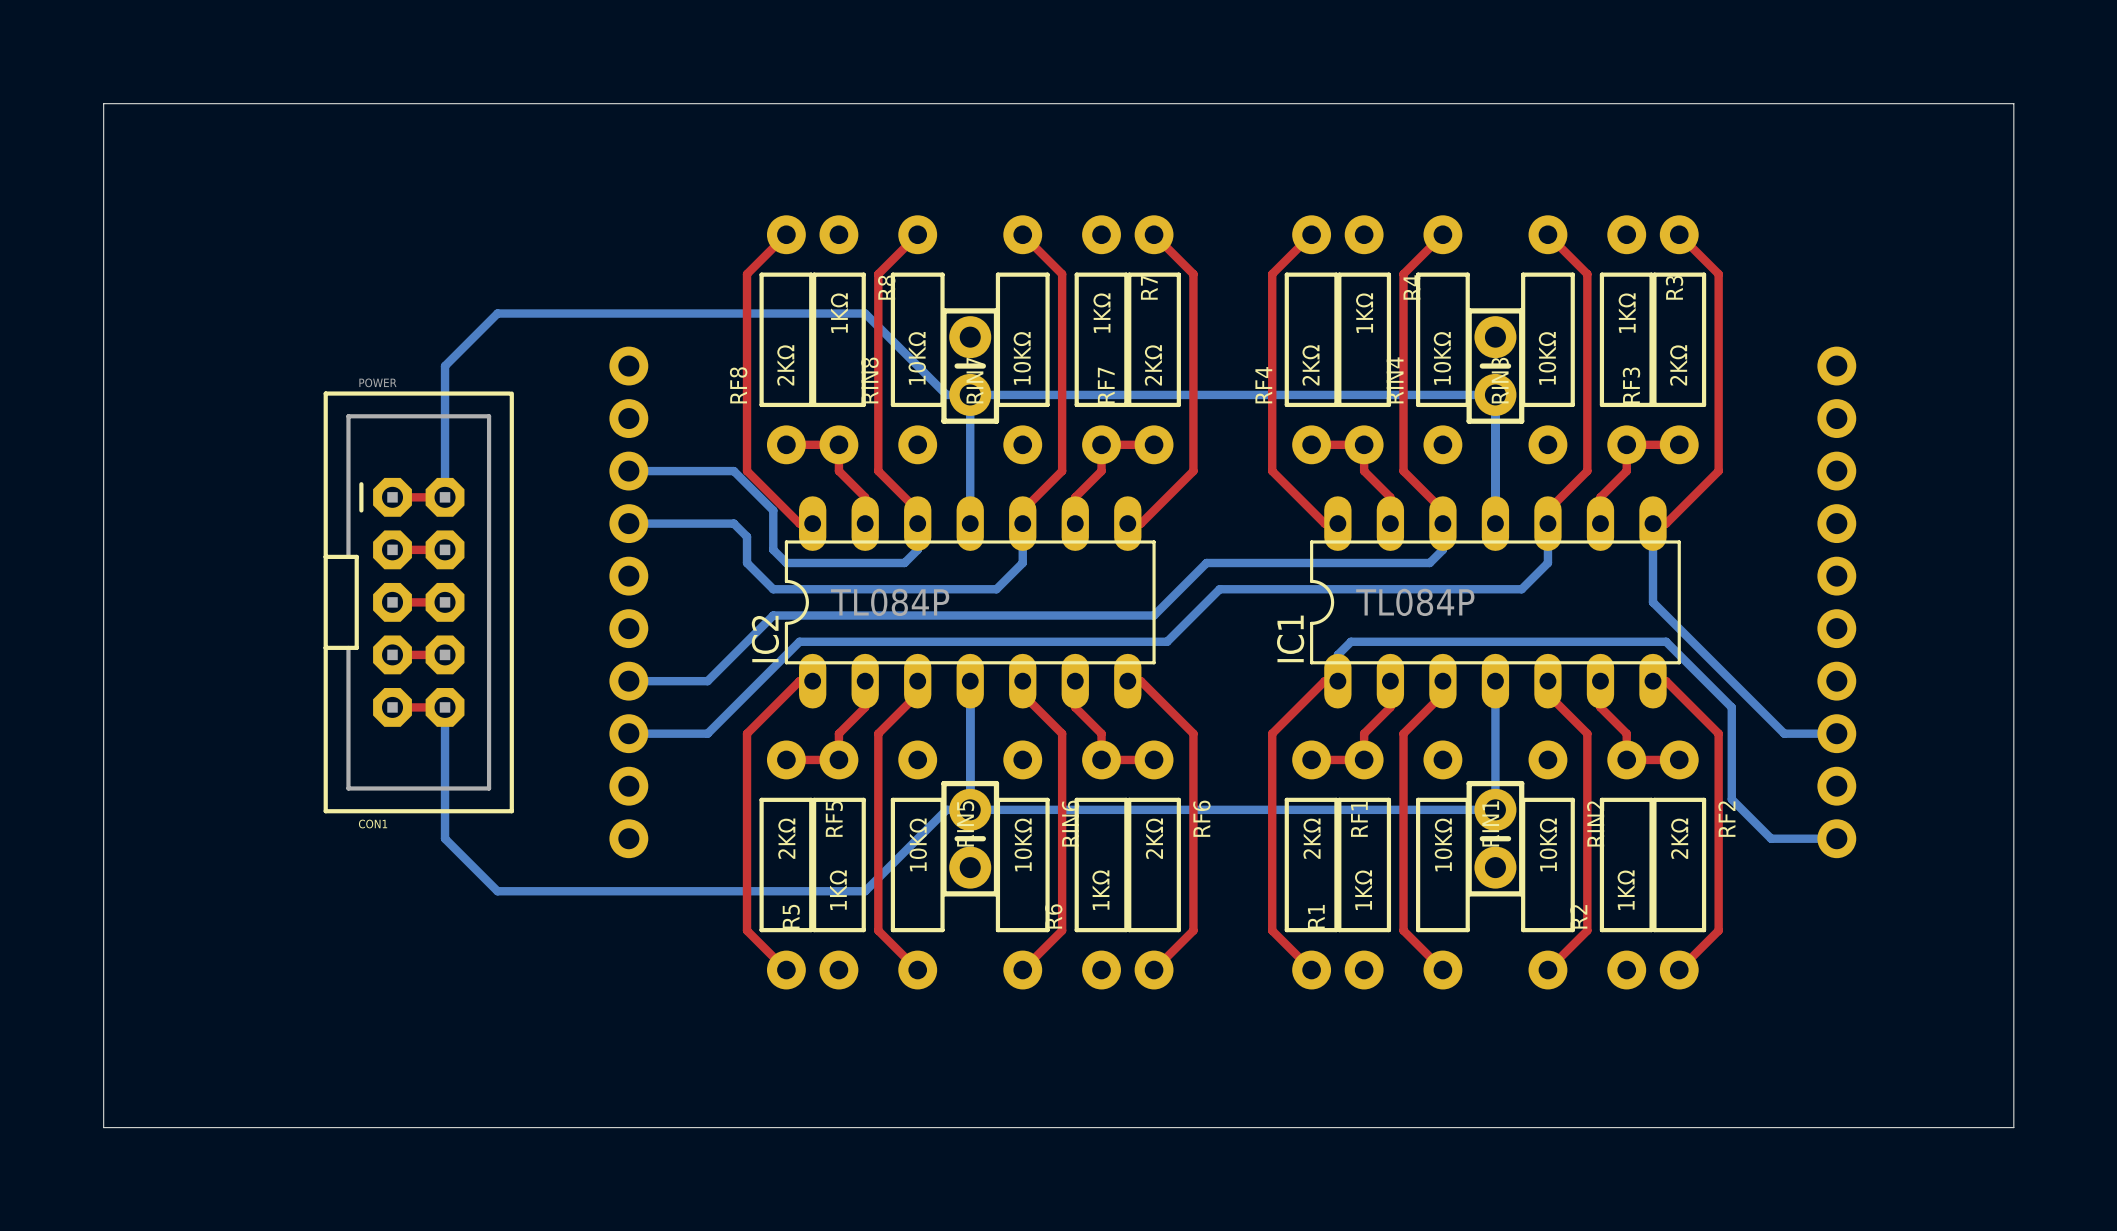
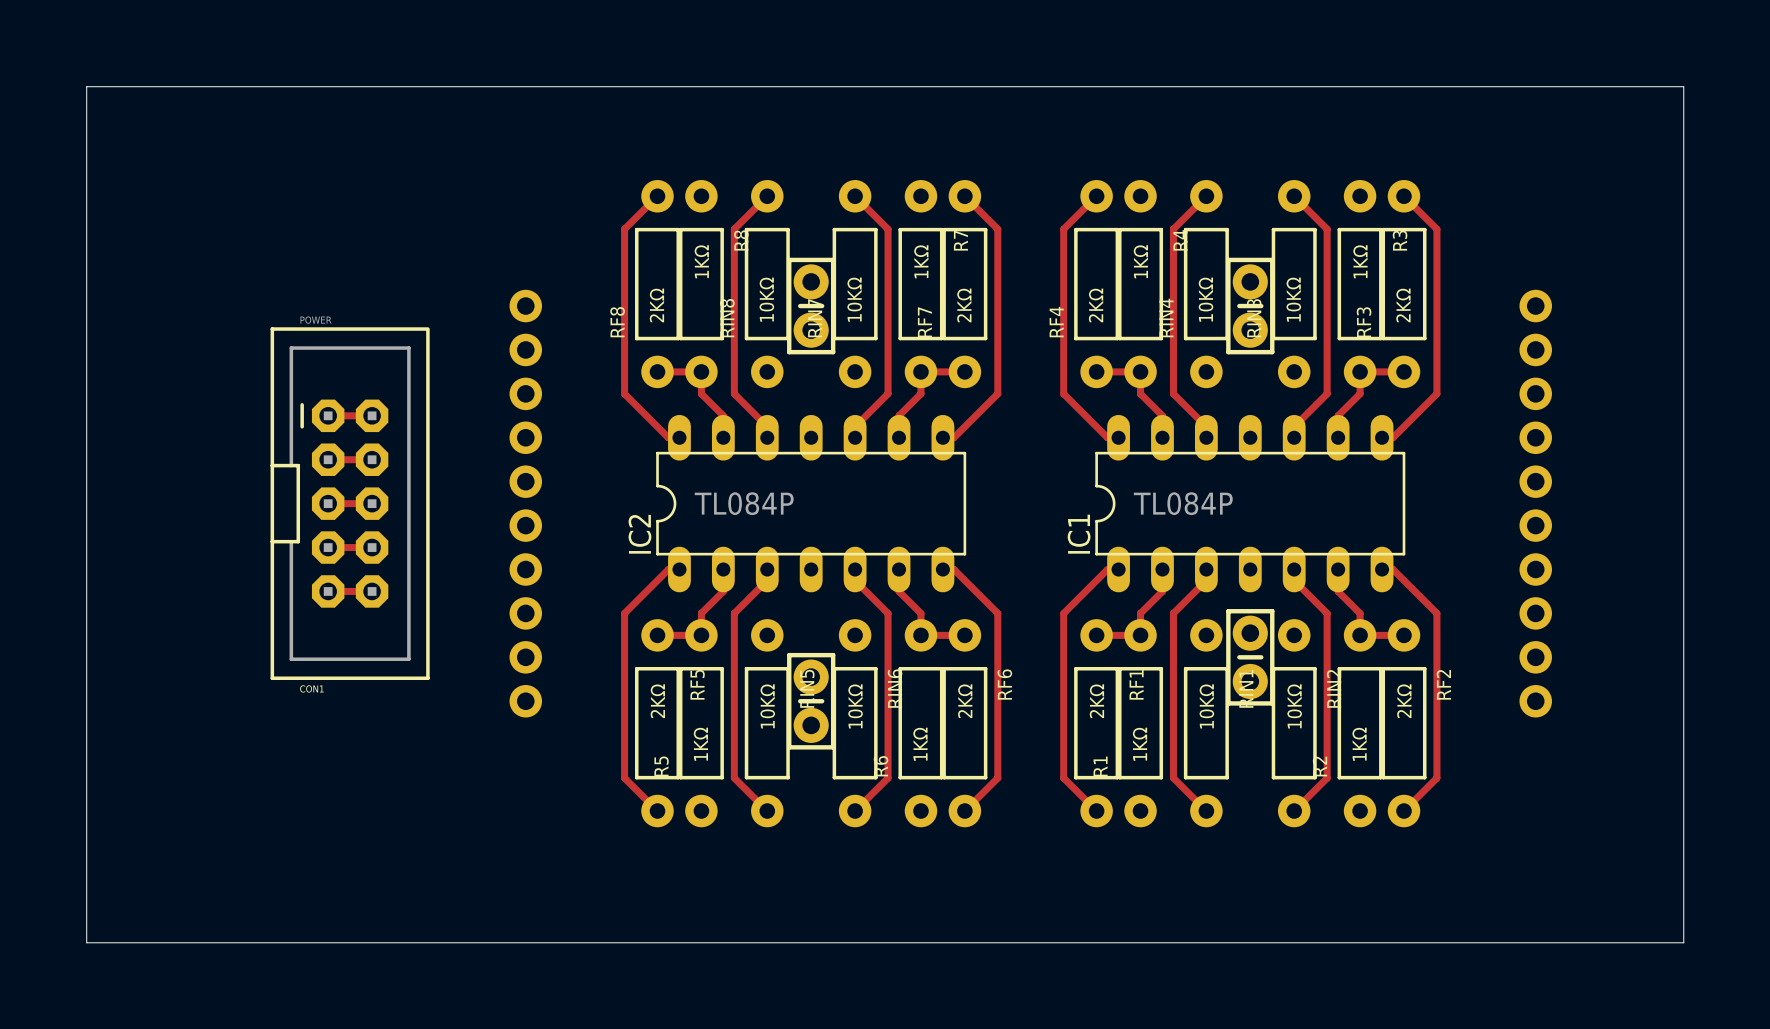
bottom track: (970, 394) (970, 523) -> none
bottom track: (628, 471) (733, 471) (773, 510) (773, 549) (786, 562) (904, 562) (917, 549) (917, 523) -> none
bottom track: (445, 497) (445, 366) (497, 313) (865, 313) (946, 394) (1492, 394) (1495, 392) (1495, 523) -> none
bottom track: (628, 523) (733, 523) (747, 536) (747, 562) (773, 589) (996, 589) (1022, 562) (1022, 523) -> none
bottom track: (1442, 523) (1442, 549) (1429, 562) (1206, 562) (1154, 615) (773, 615) (707, 681) (628, 681) -> none
bottom track: (1547, 523) (1547, 562) (1521, 589) (1219, 589) (1167, 641) (799, 641) (707, 733) (628, 733) -> none
bottom track: (1652, 523) (1652, 602) (1784, 733) (1836, 733) -> none
bottom track: (970, 681) (970, 812) (972, 809) (1495, 809) (1495, 681) -> none
bottom track: (1337, 681) (1337, 654) (1351, 641) (1666, 641) (1731, 707) (1731, 799) (1771, 838) (1836, 838) -> none
bottom track: (445, 707) (445, 838) (497, 891) (865, 891) (946, 809) (970, 809) -> none
part position: (1495, 838) -> (1250, 657)

